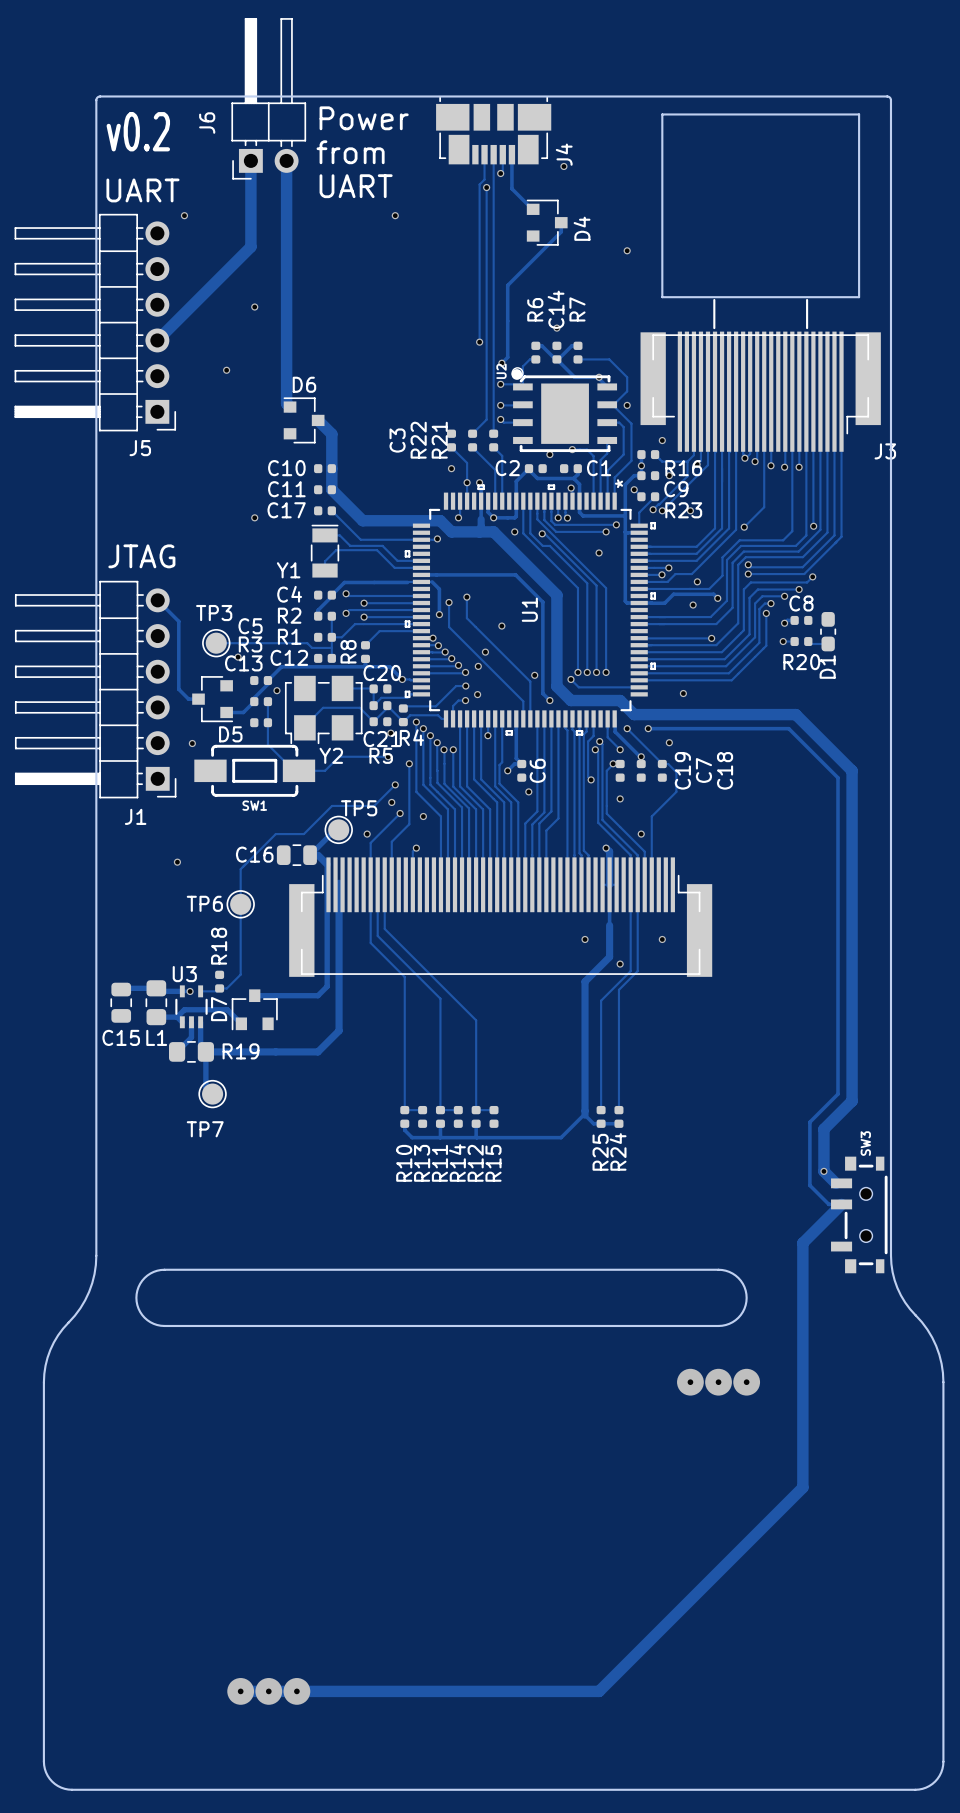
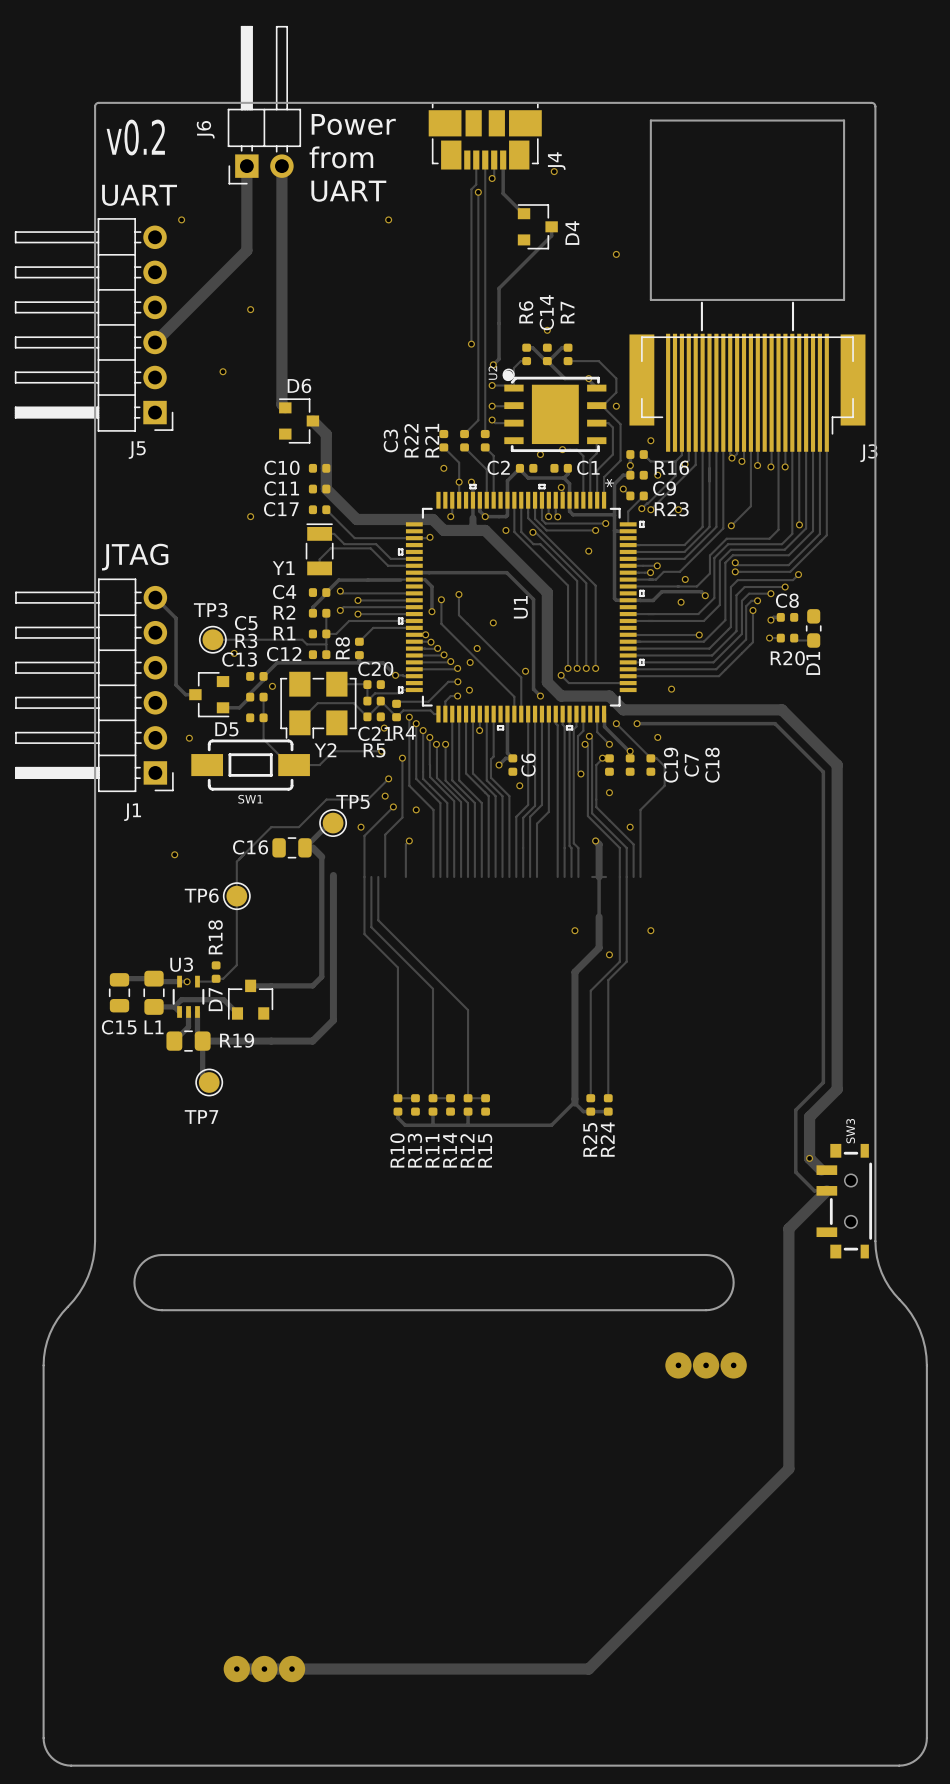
part: (500, 917) -> none

